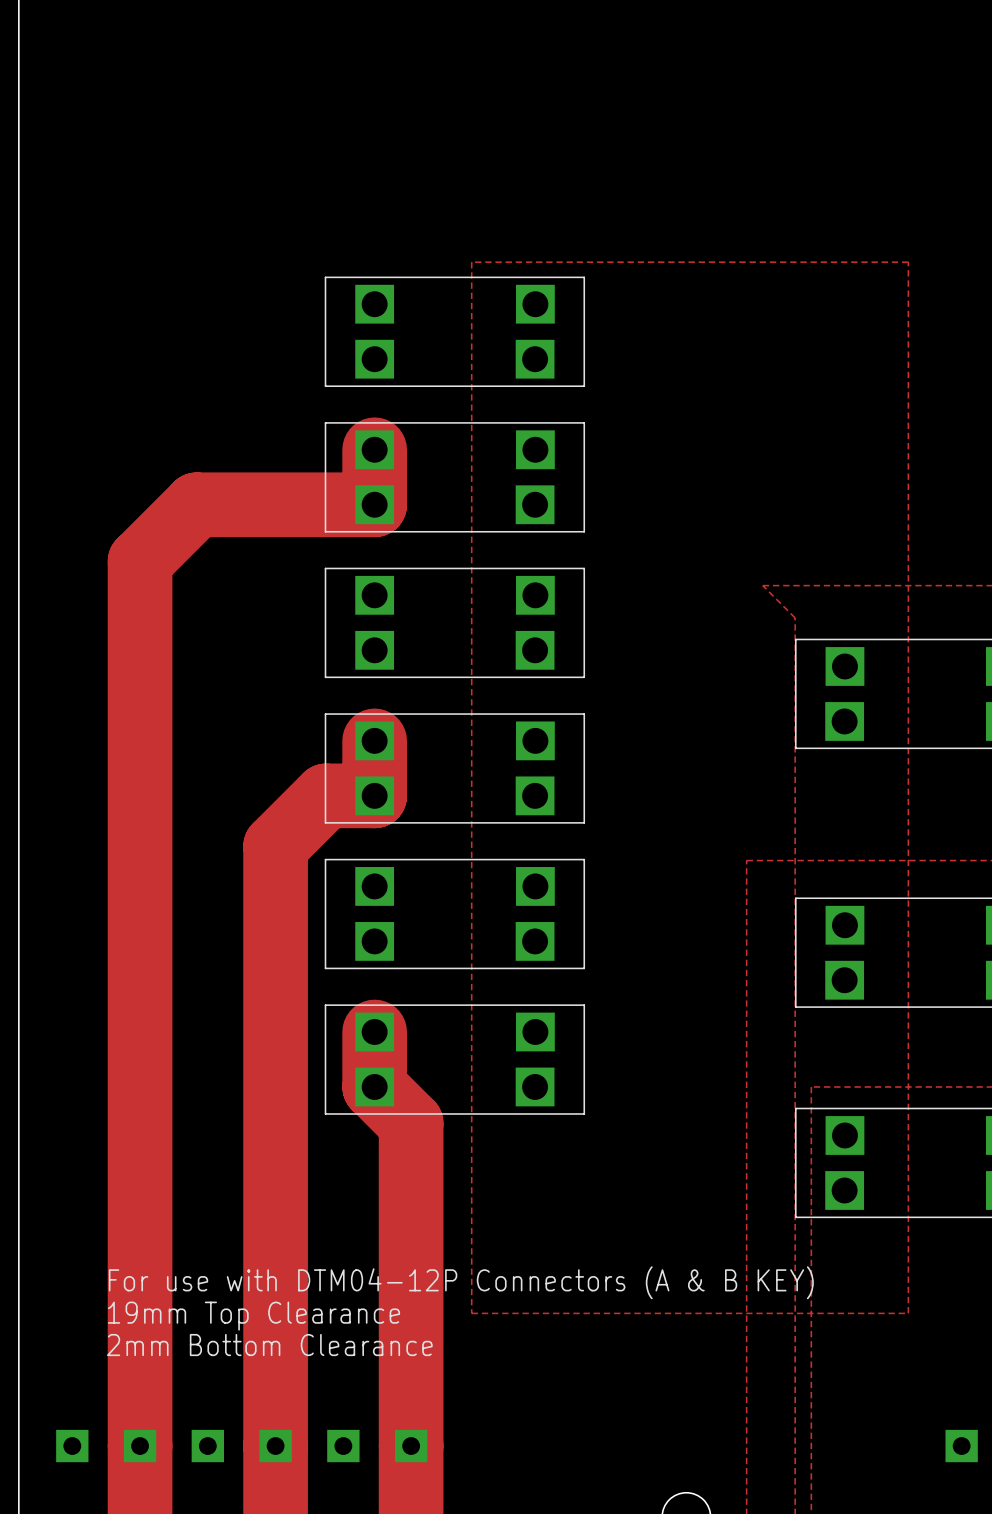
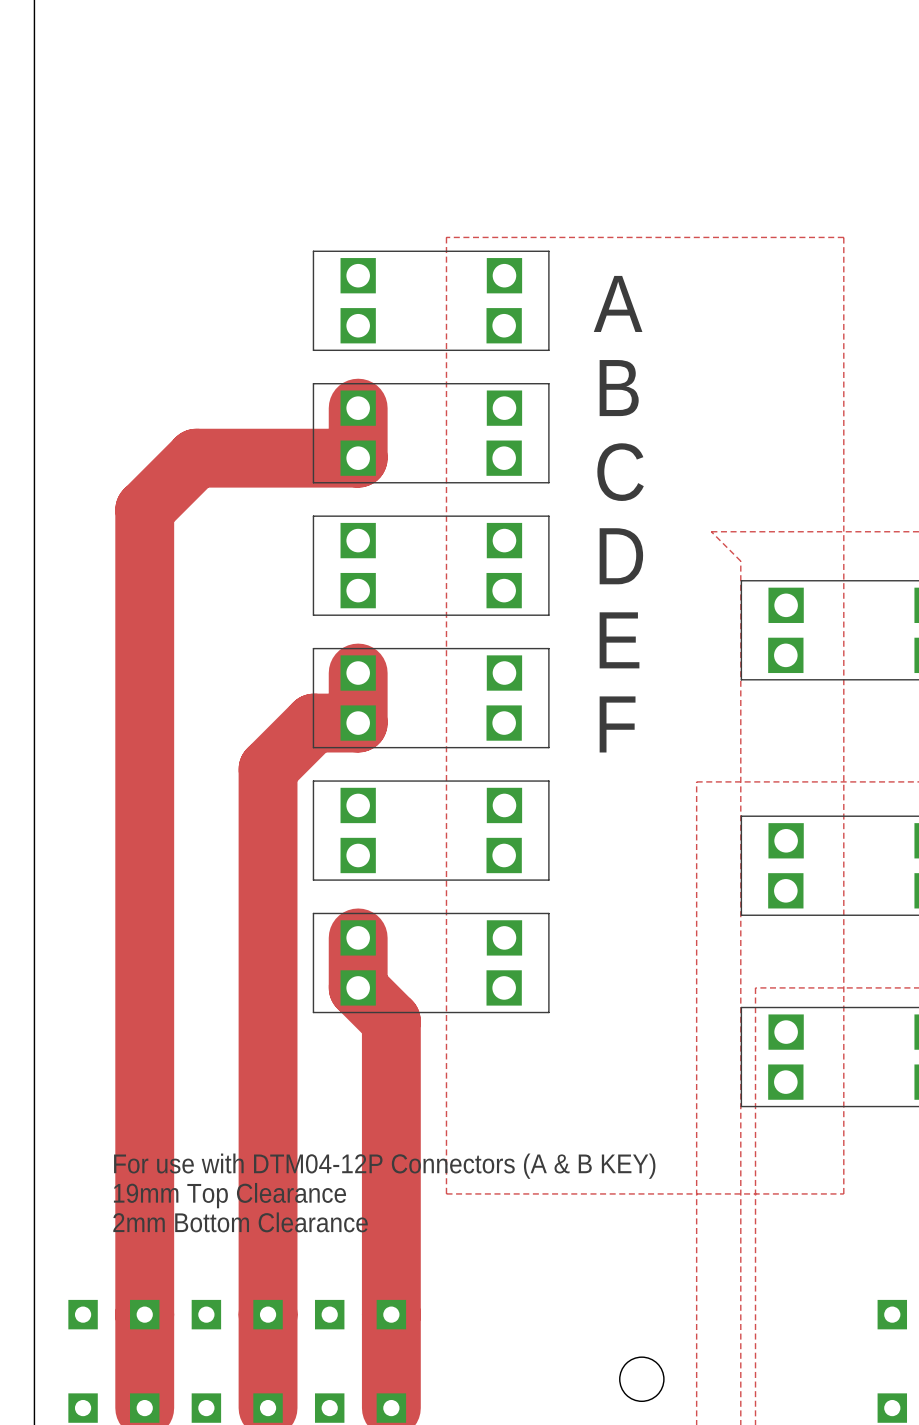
text: none -> A (618, 303)
text: none -> B (619, 388)
text: none -> C (620, 472)
text: none -> D (621, 556)
text: none -> E (619, 640)
text: none -> F (617, 724)

